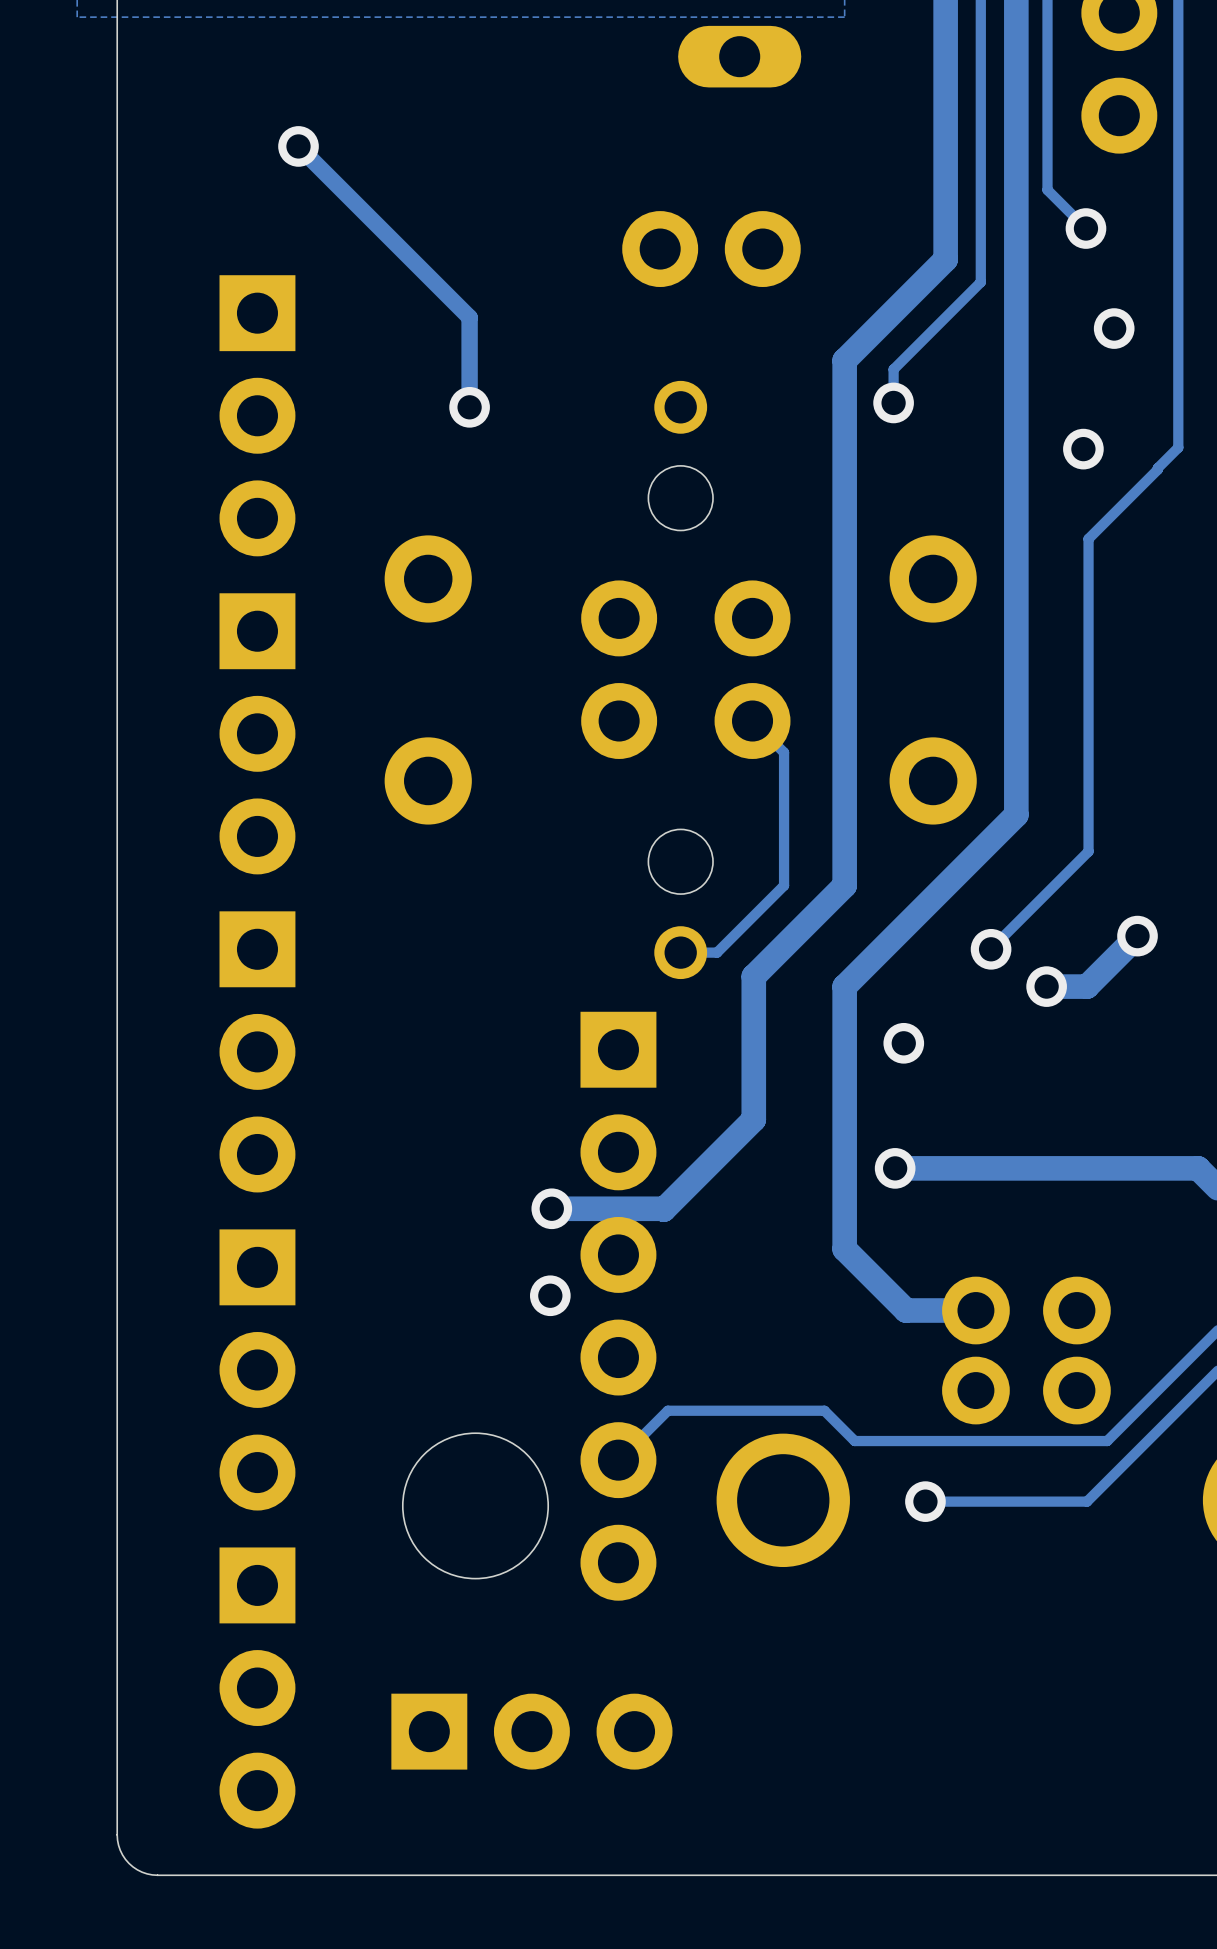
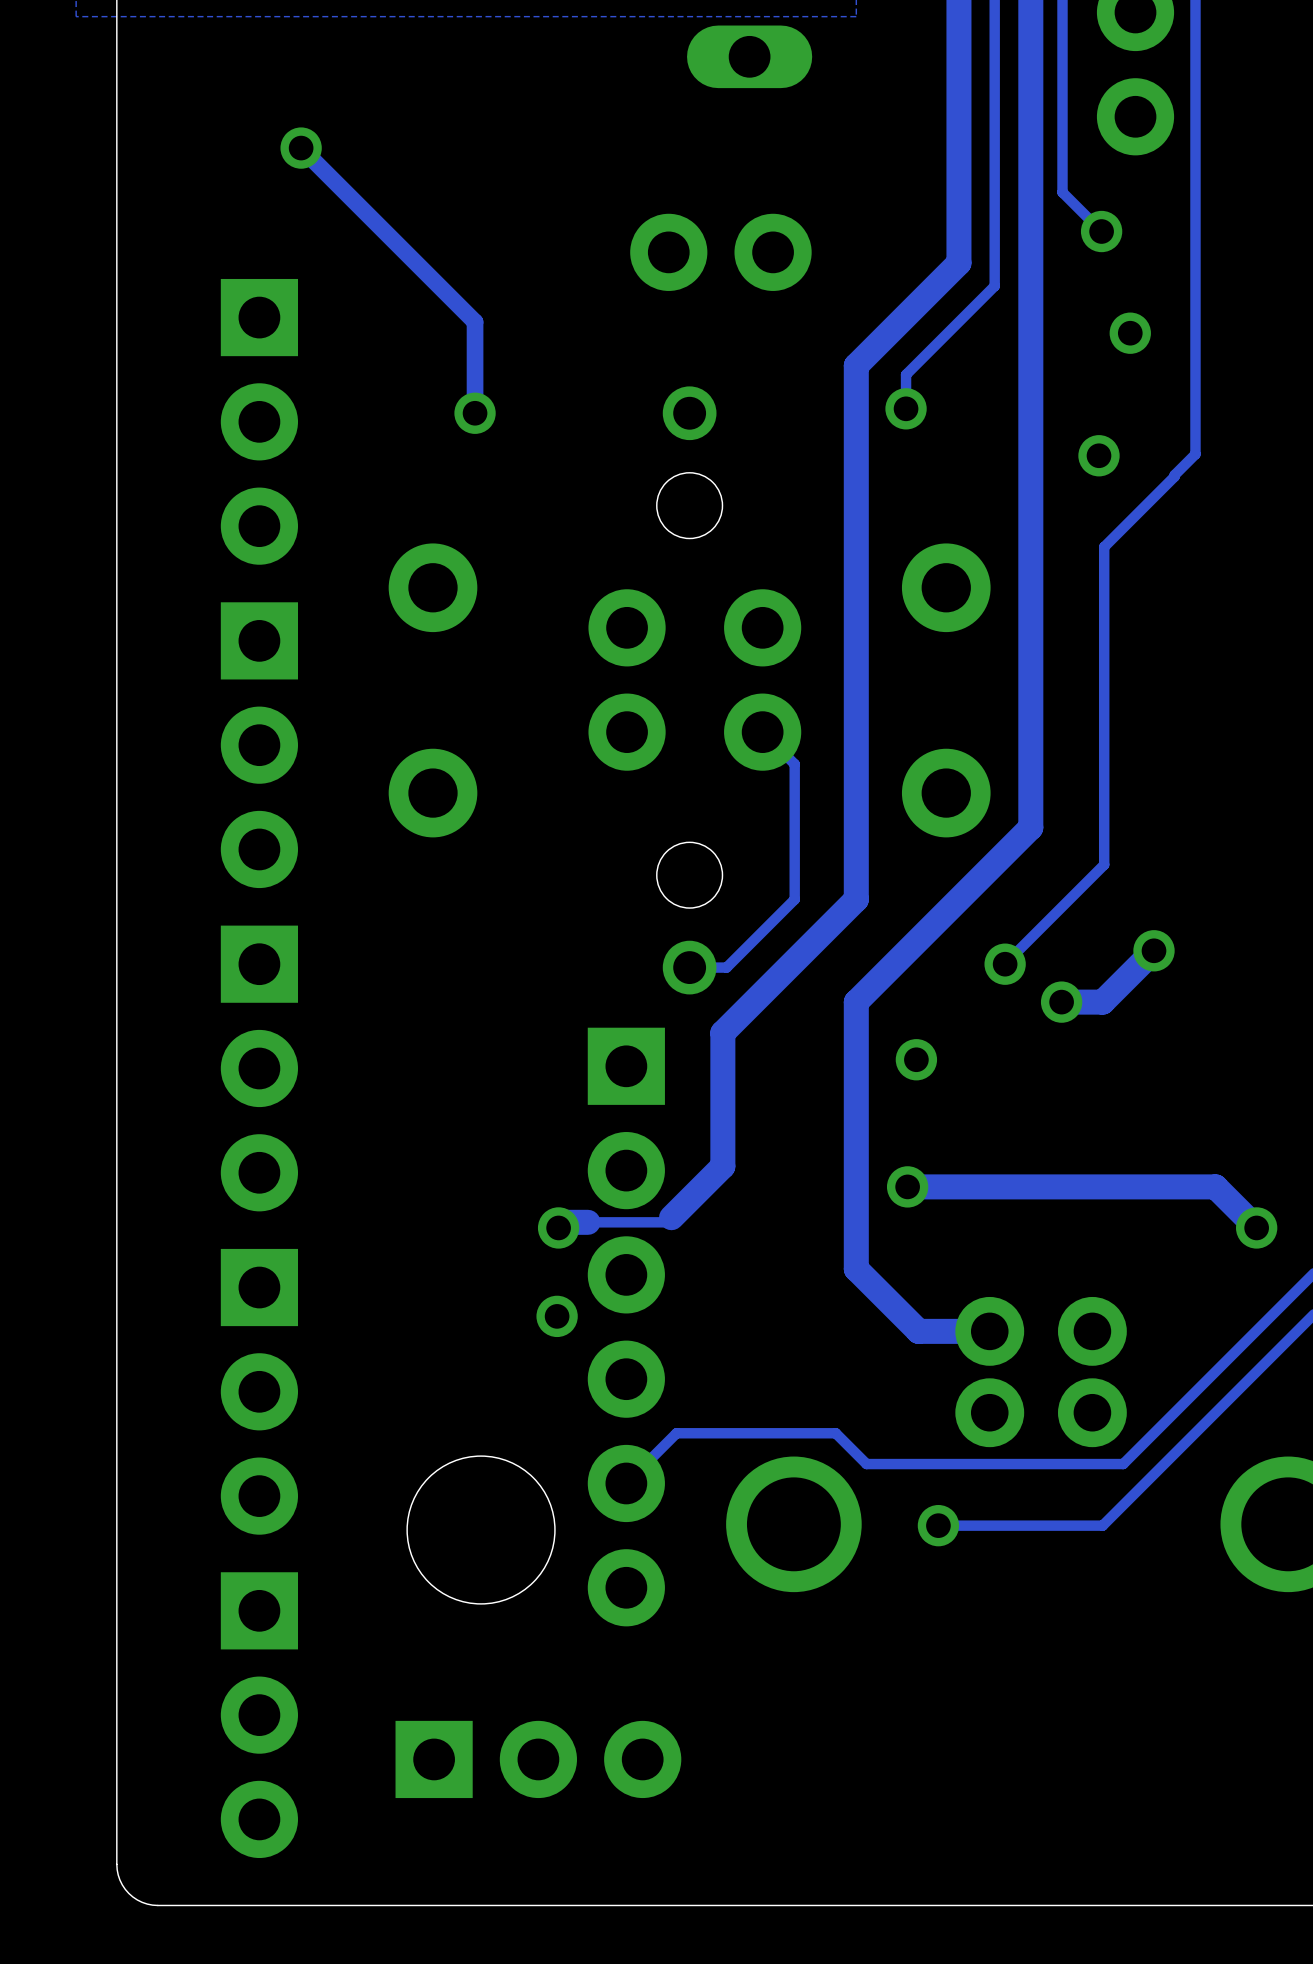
track: (753, 976) (753, 1119) (663, 1209) (551, 1208) -> (763, 991) (722, 1032) (722, 1166) (666, 1222) (564, 1222) (558, 1227)

